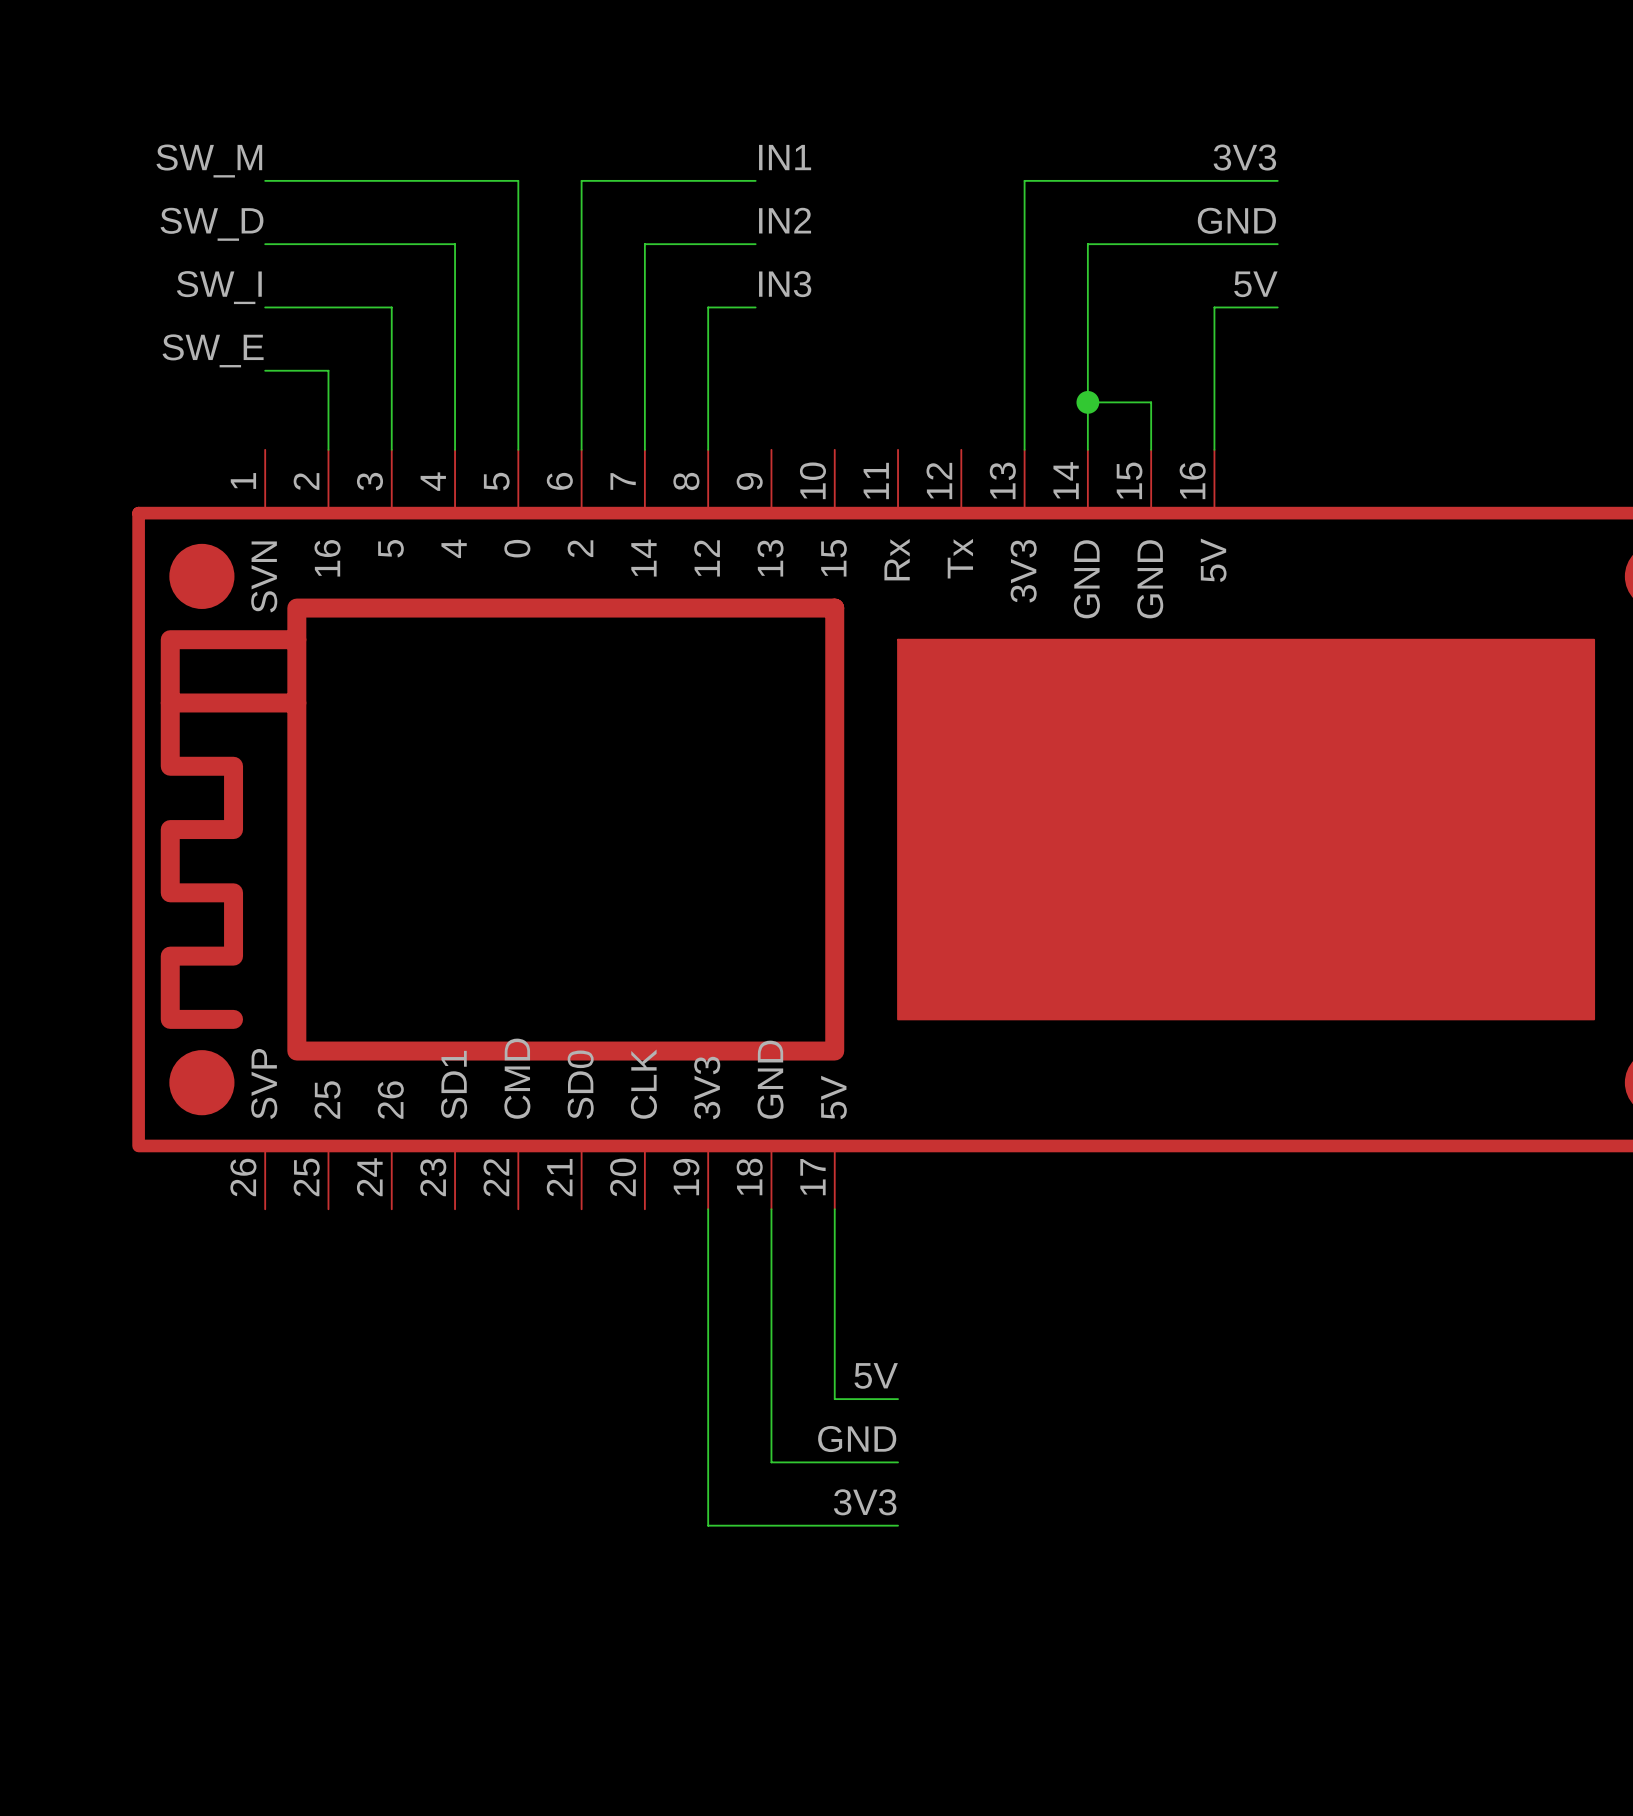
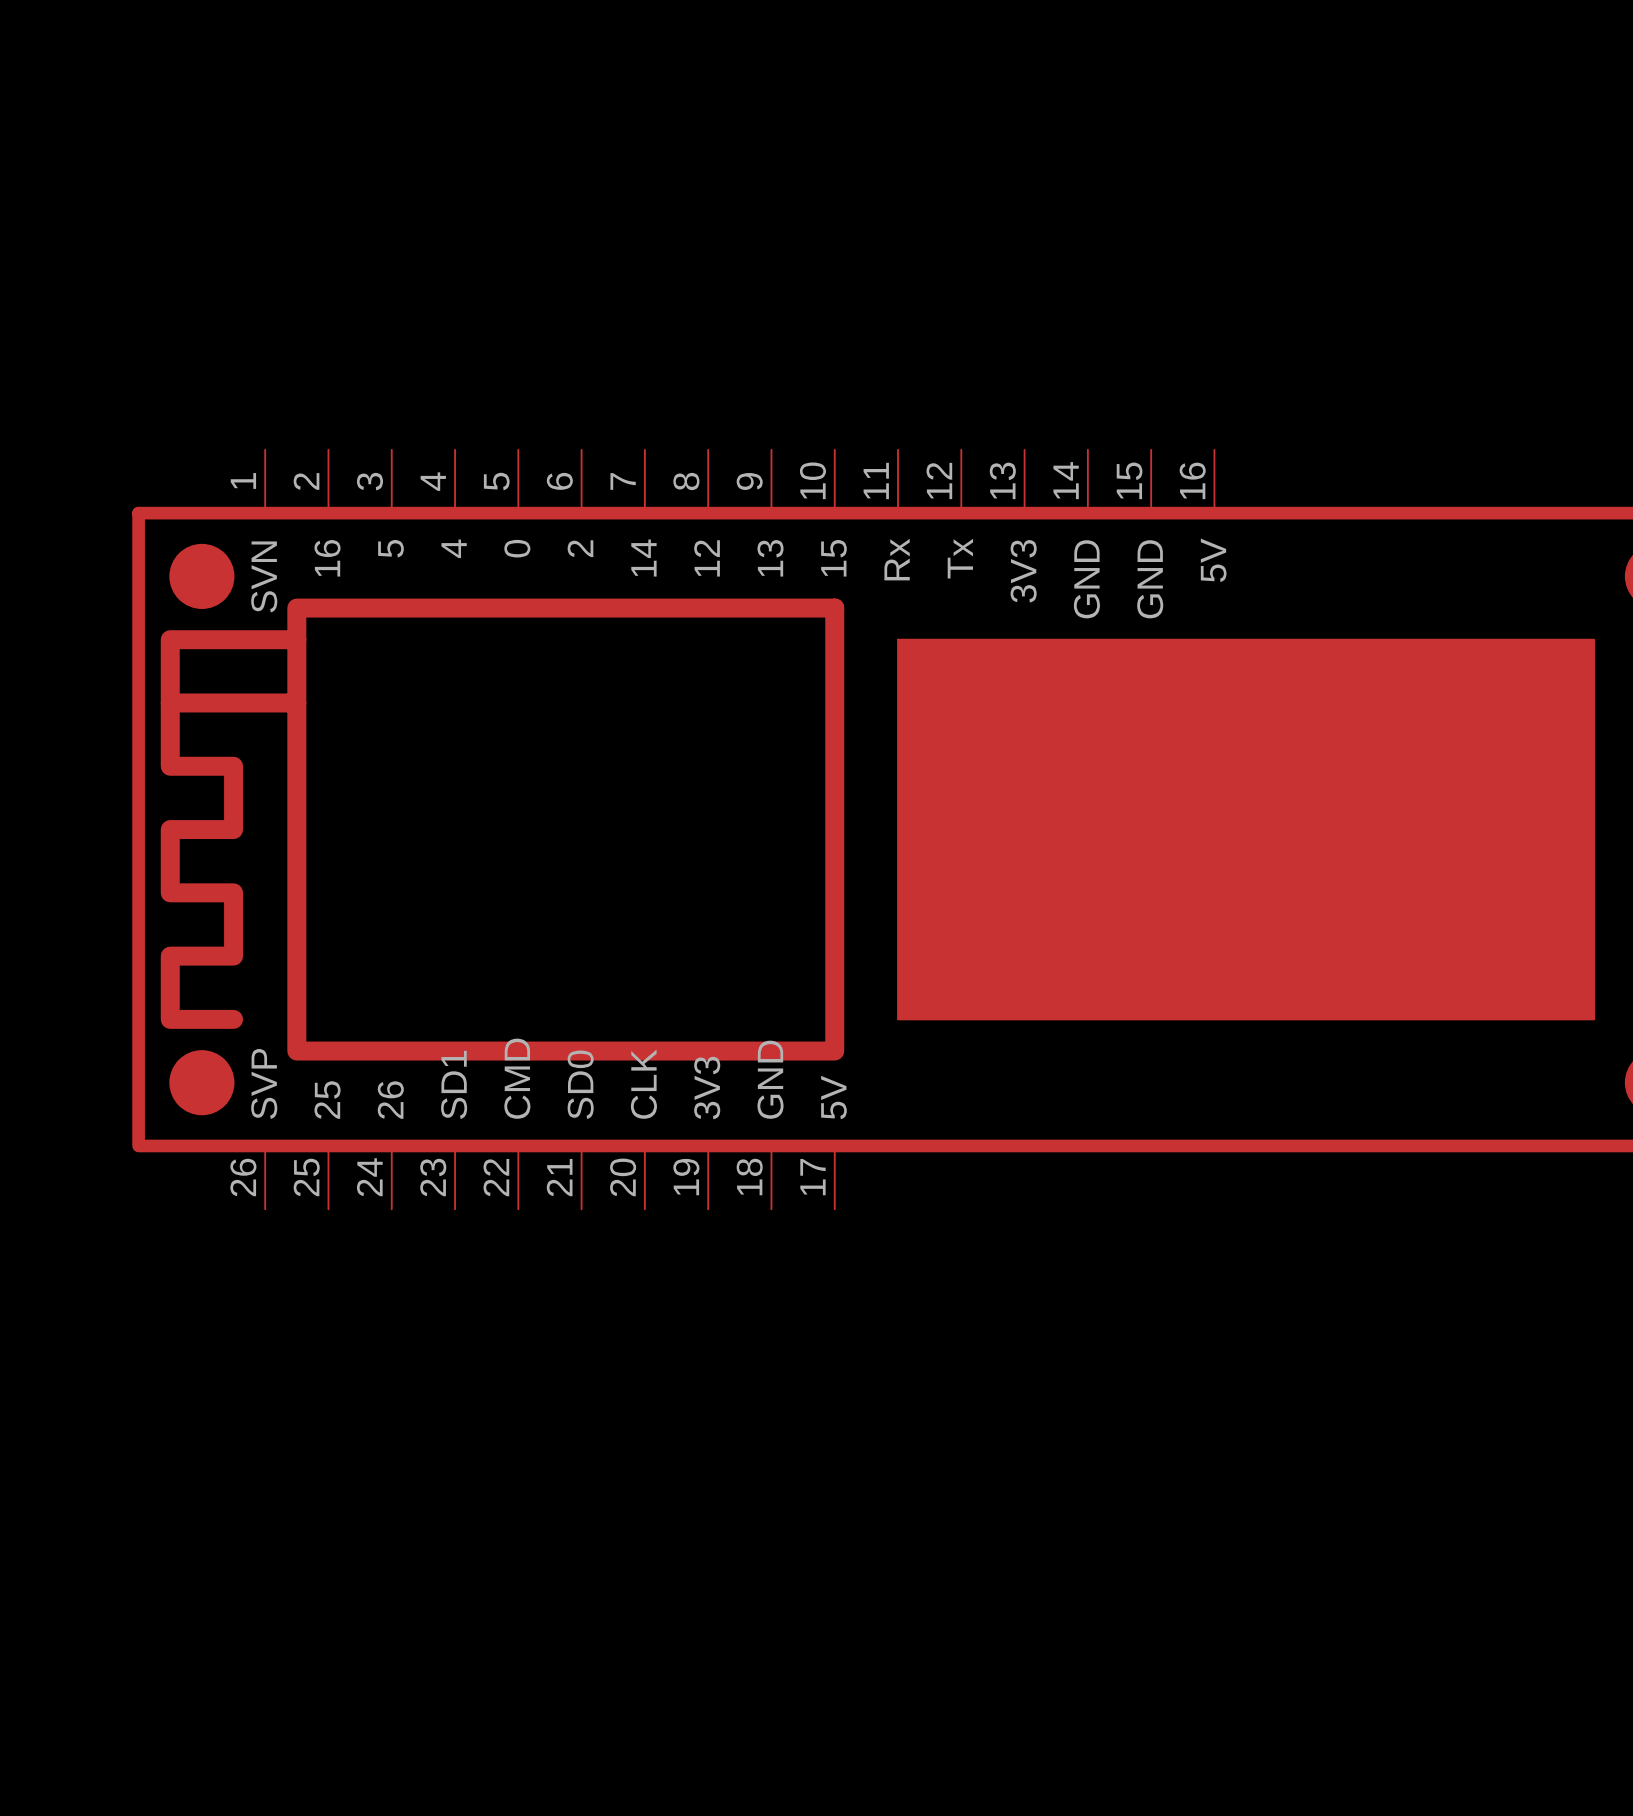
label: IN1 (785, 157) -> none
label: 3V3 (1244, 157) -> none
label: SW_M (209, 161) -> none
wire: (265, 180) (518, 180) (518, 449) -> none
wire: (755, 180) (581, 180) (581, 449) -> none
wire: (1277, 180) (1024, 180) (1024, 449) -> none
label: IN2 (785, 220) -> none
label: GND (1236, 220) -> none
label: SW_D (211, 224) -> none
wire: (265, 244) (455, 244) (455, 449) -> none
wire: (755, 244) (644, 244) (644, 449) -> none
wire: (1277, 244) (1087, 244) (1087, 449) -> none
label: IN3 (785, 284) -> none
label: 5V (1255, 284) -> none
label: SW_I (219, 287) -> none
wire: (265, 307) (391, 307) (391, 449) -> none
wire: (755, 307) (708, 307) (708, 449) -> none
wire: (1277, 307) (1214, 307) (1214, 449) -> none
label: SW_E (213, 350) -> none
wire: (265, 370) (328, 370) (328, 449) -> none
wire: (1087, 402) (1151, 402) (1151, 449) -> none
junction: (1087, 402) -> none
wire: (708, 1209) (708, 1525) (898, 1525) -> none
wire: (771, 1209) (771, 1462) (898, 1462) -> none
wire: (834, 1209) (834, 1399) (898, 1399) -> none
label: 5V (876, 1375) -> none
label: GND (857, 1439) -> none
label: 3V3 (865, 1502) -> none

